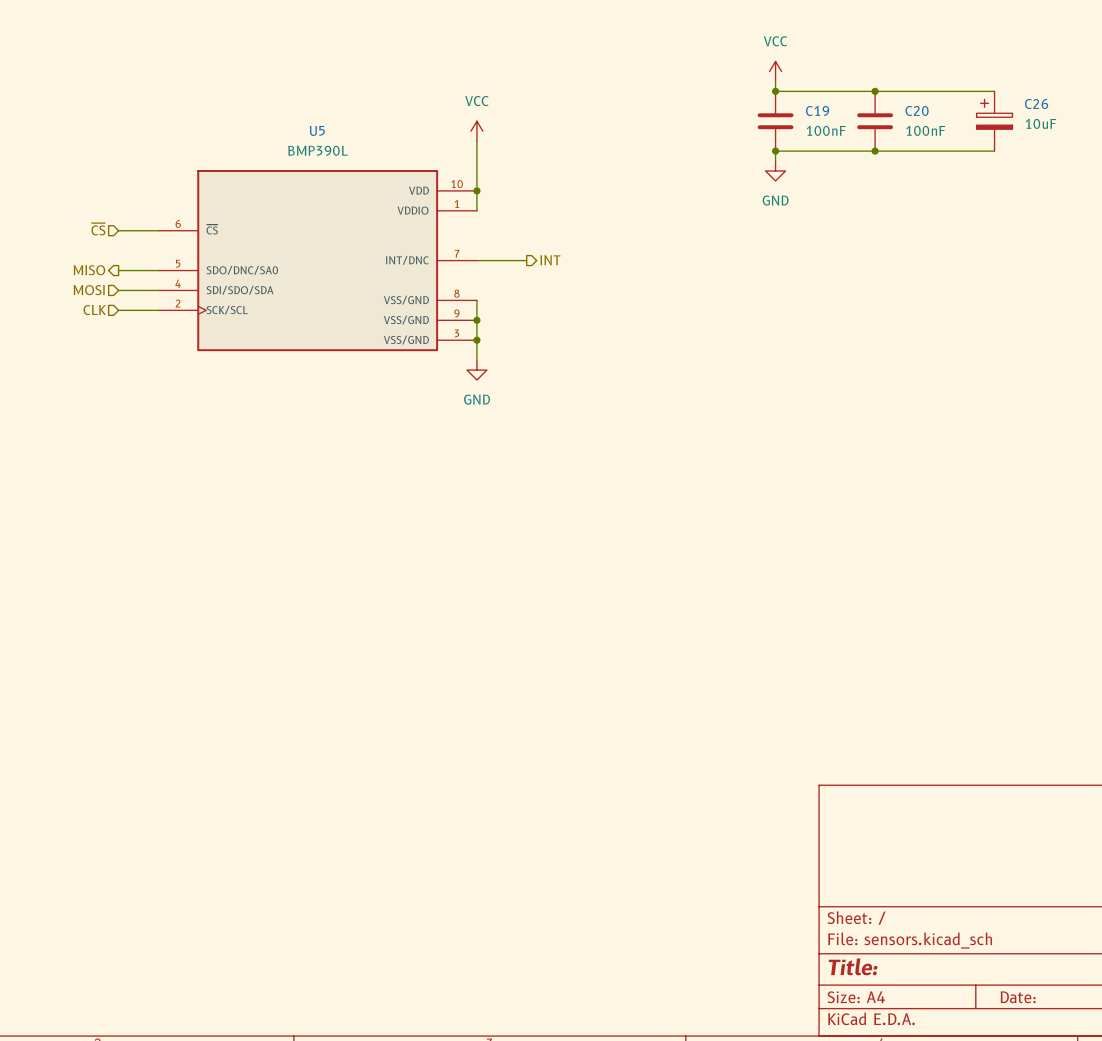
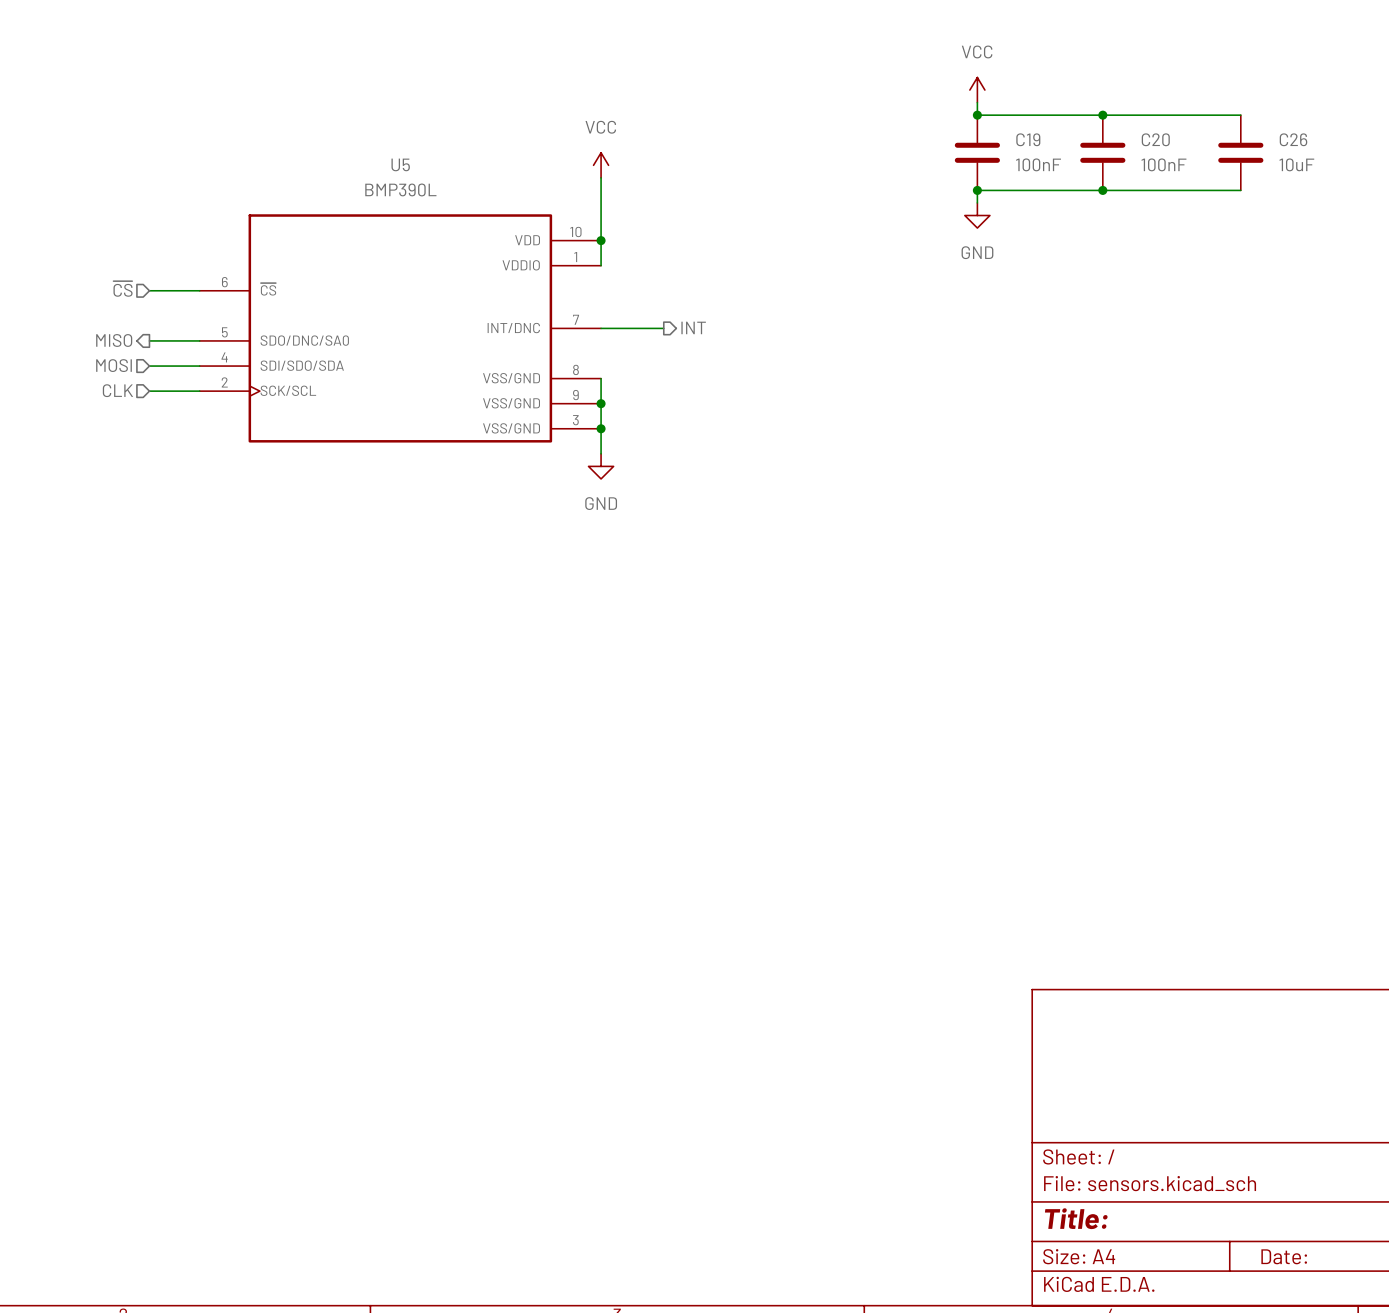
C26 symbol: [976, 91, 1013, 152] -> [1218, 115, 1264, 191]
wire: (984, 91) (994, 91) -> none
wire: (984, 151) (994, 151) -> none

